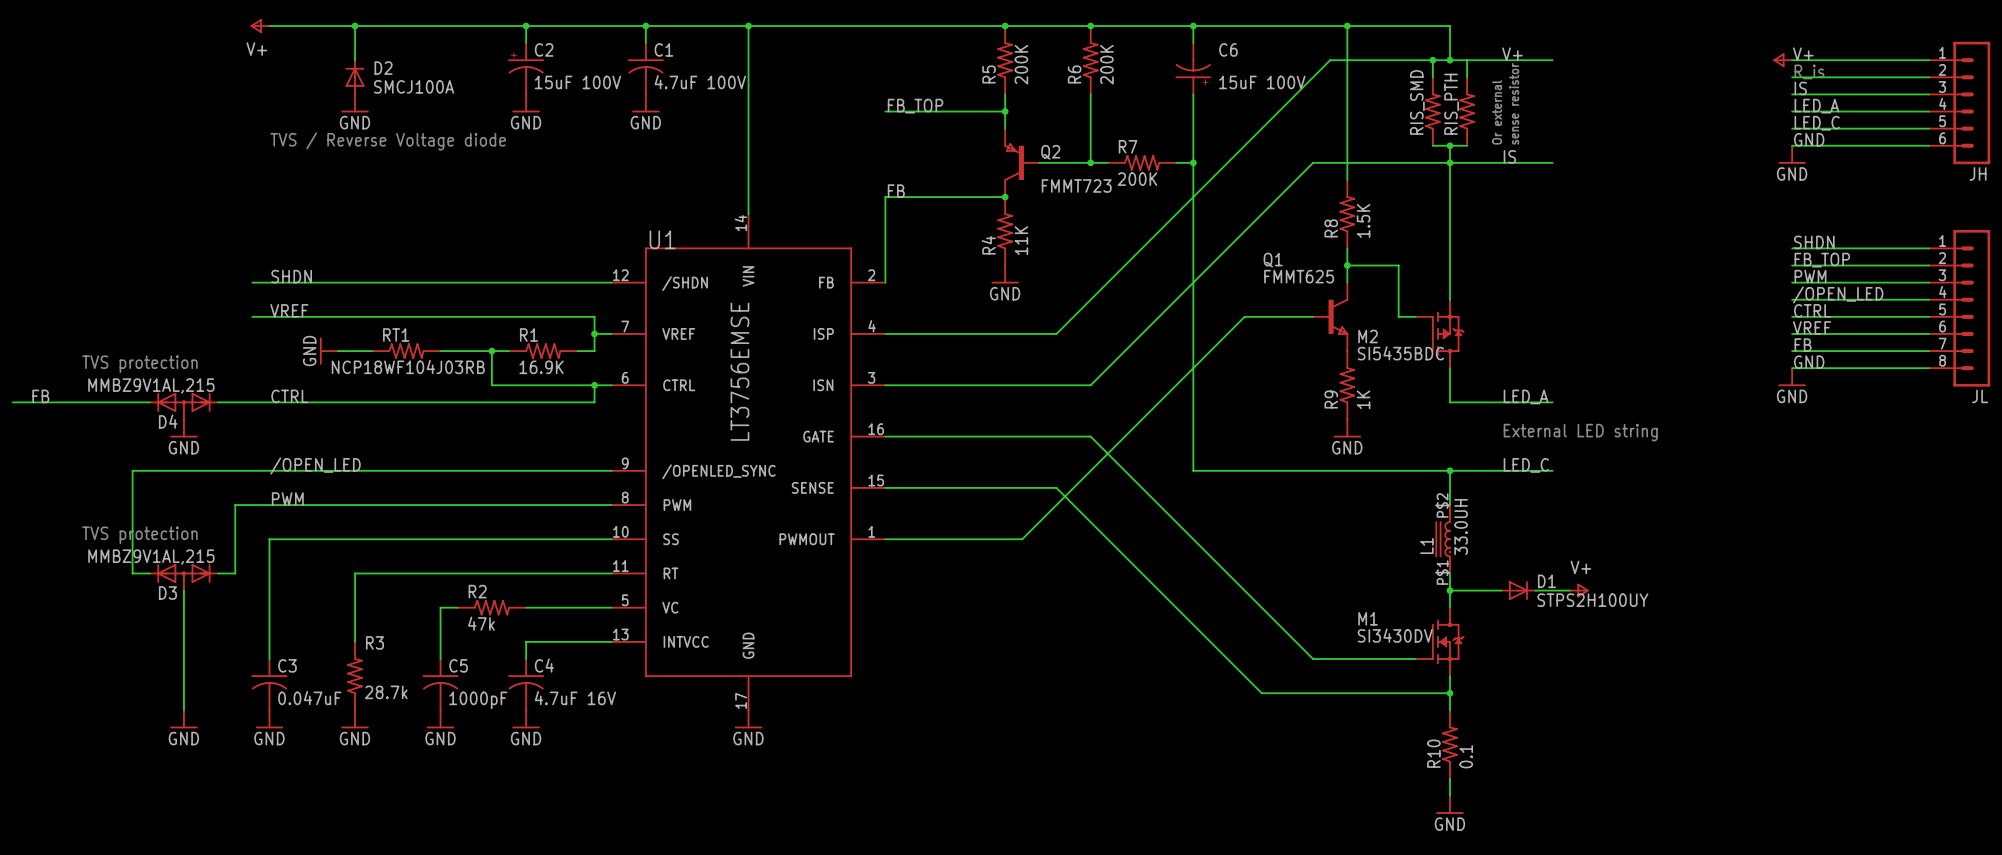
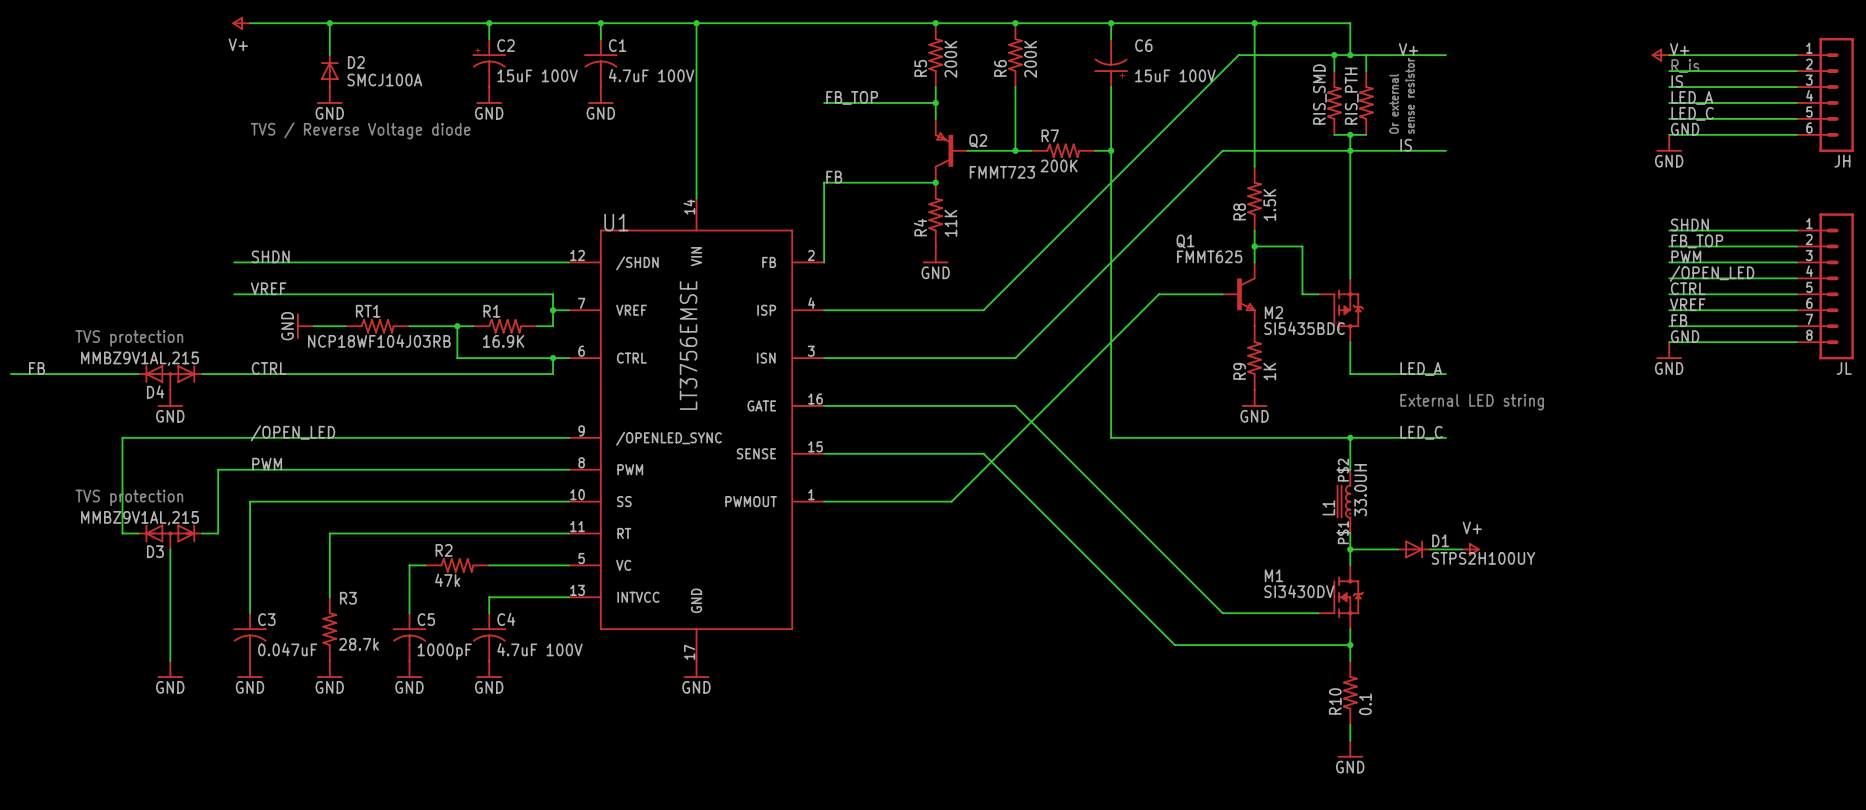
C4 value: 4.7uF 16V (575, 698) -> 4.7uF 100V (539, 649)

